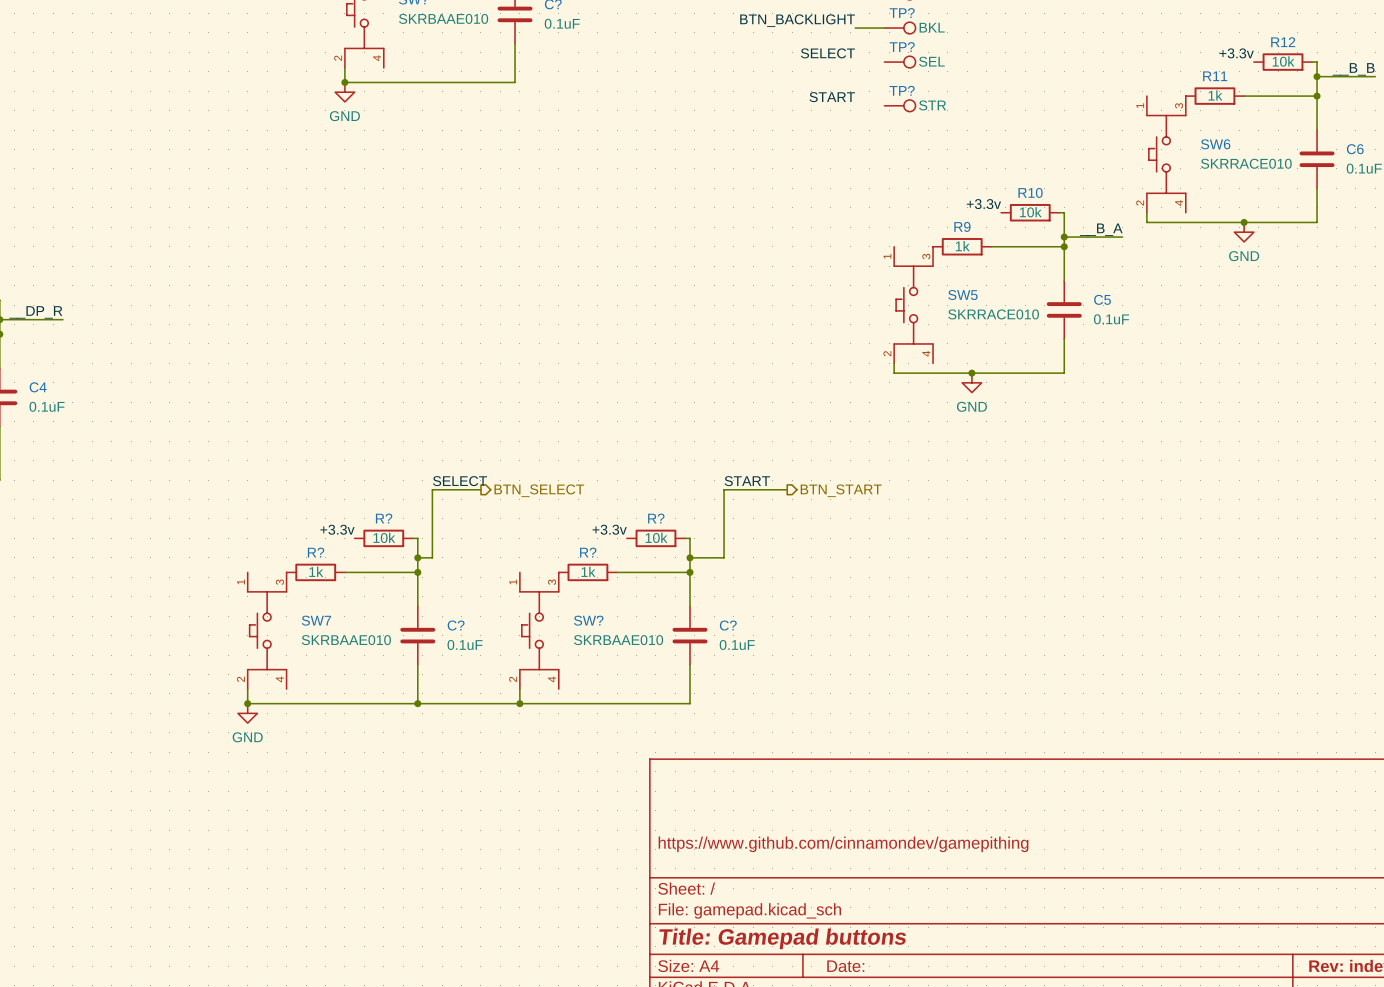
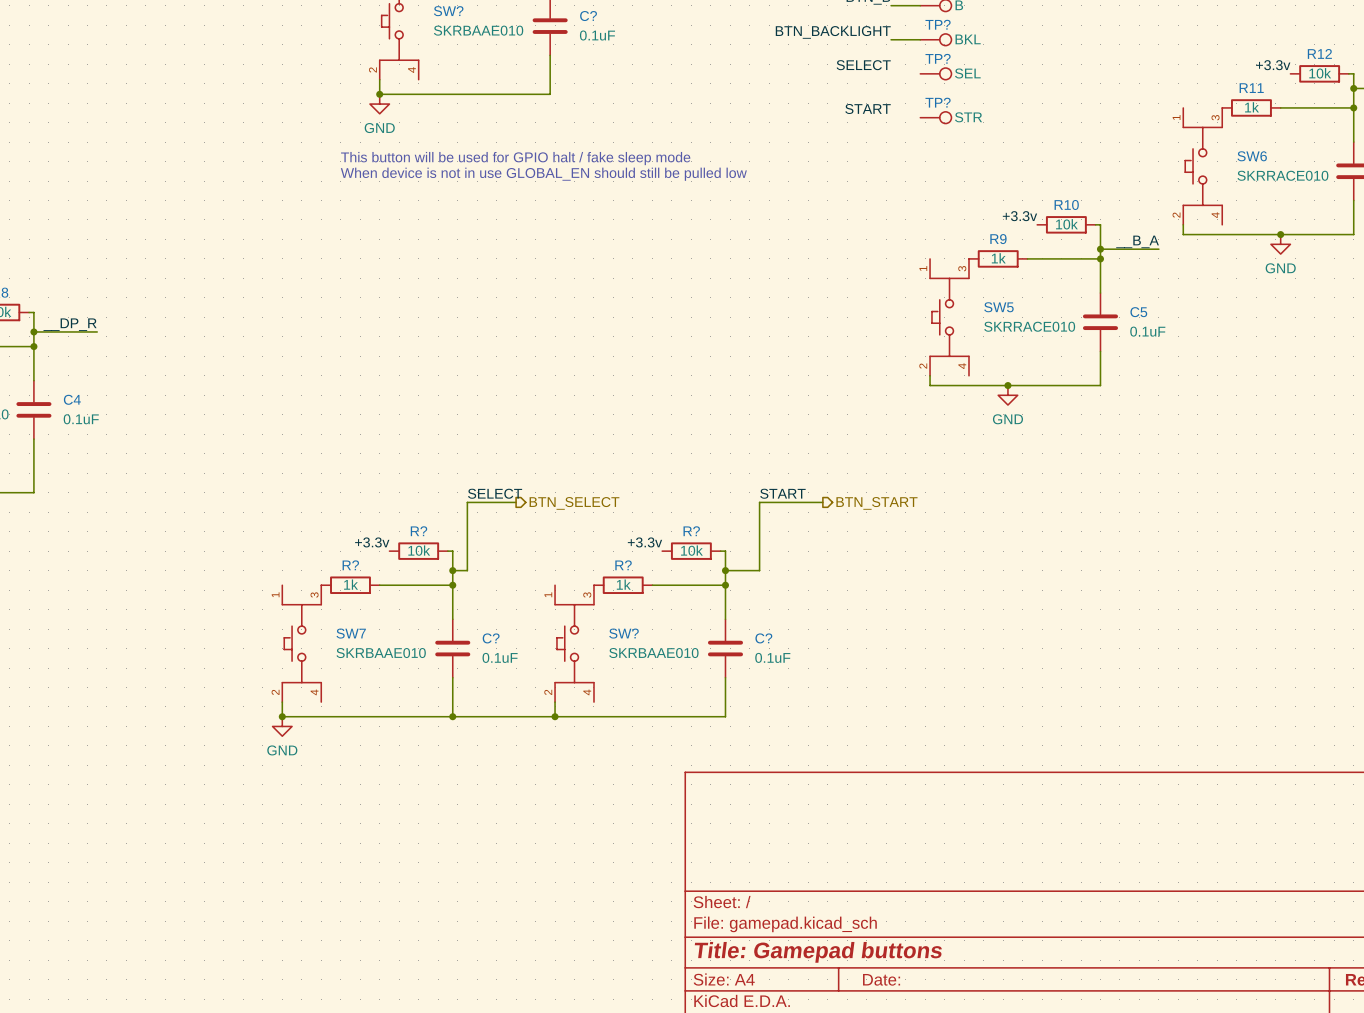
text: none -> This button will be used for GPIO halt / fake sleep mode (515, 158)
text: none -> When device is not in use GLOBAL_EN should still be pulled low (543, 174)
title block: https://www.github.com/cinnamondev/gamepithing (843, 844) -> none

